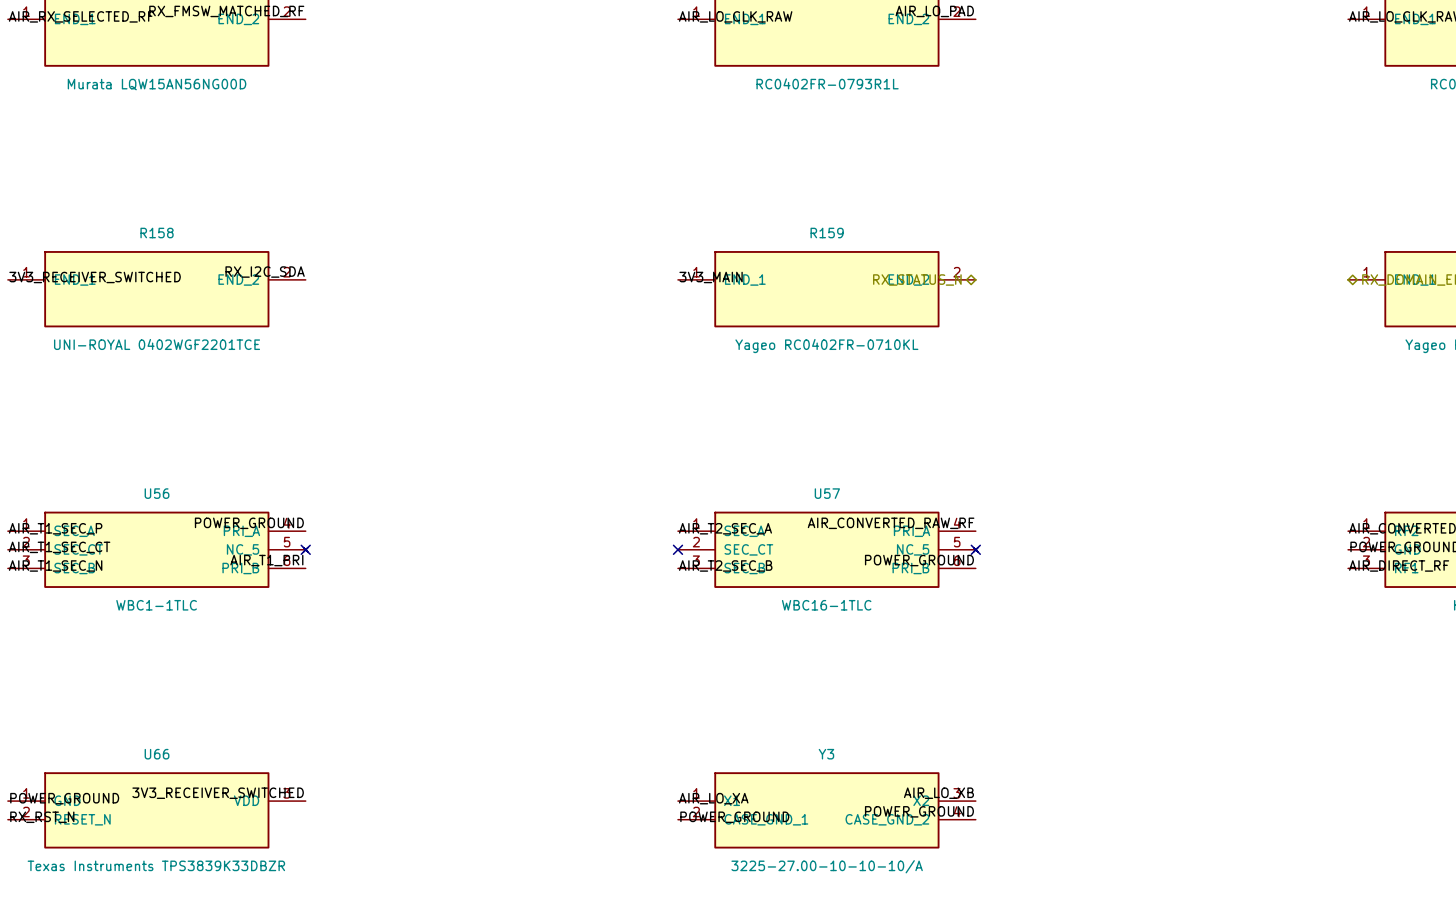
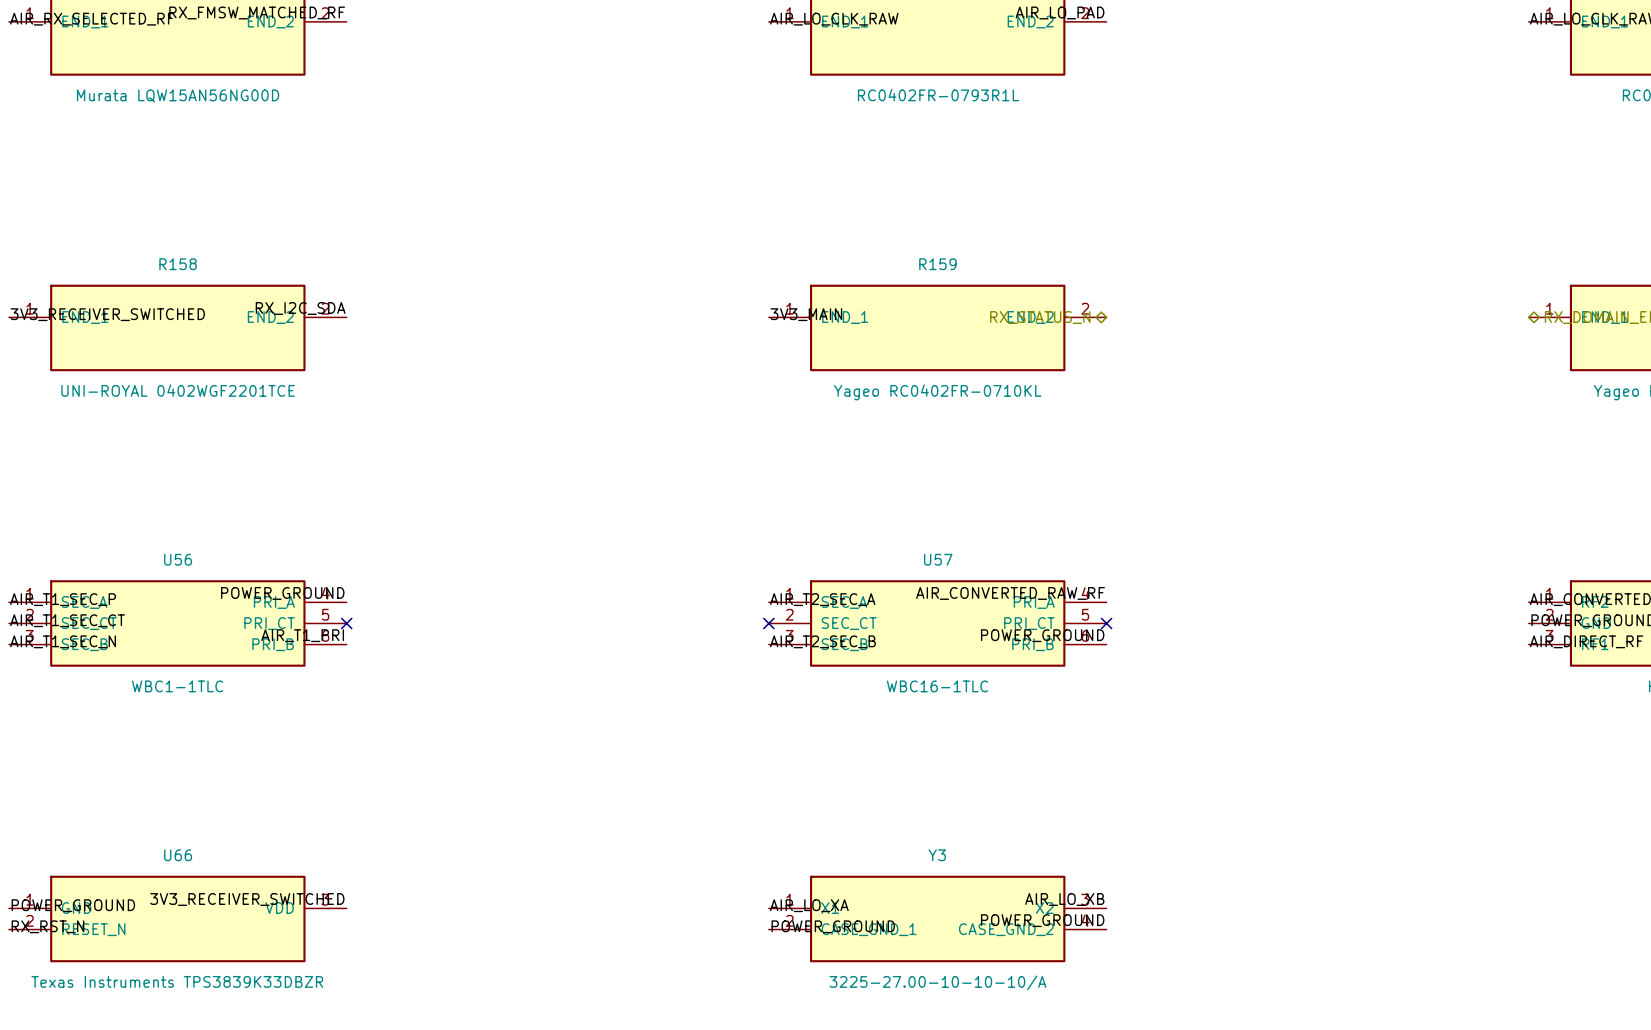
U56 symbol: [7, 511, 308, 588] -> [8, 580, 347, 667]
U57 symbol: [677, 511, 979, 588] -> [768, 580, 1107, 667]

